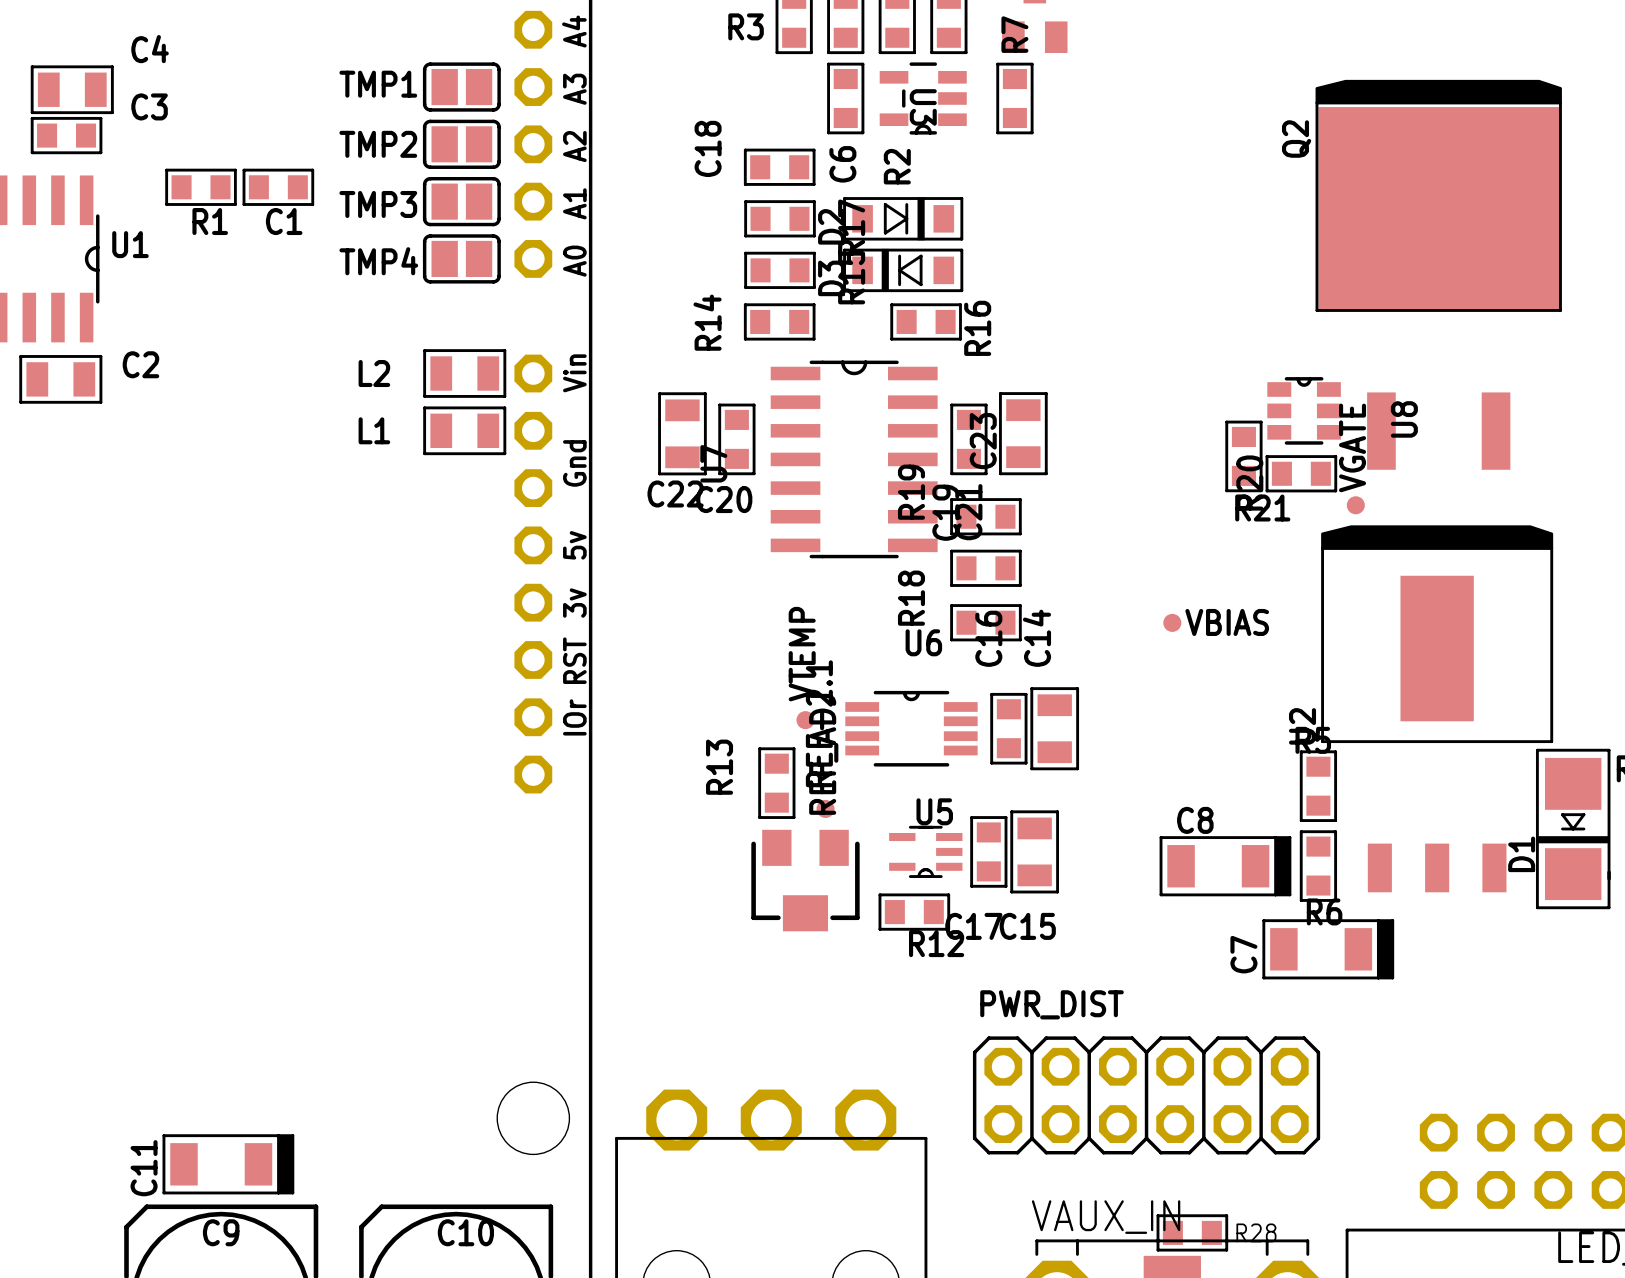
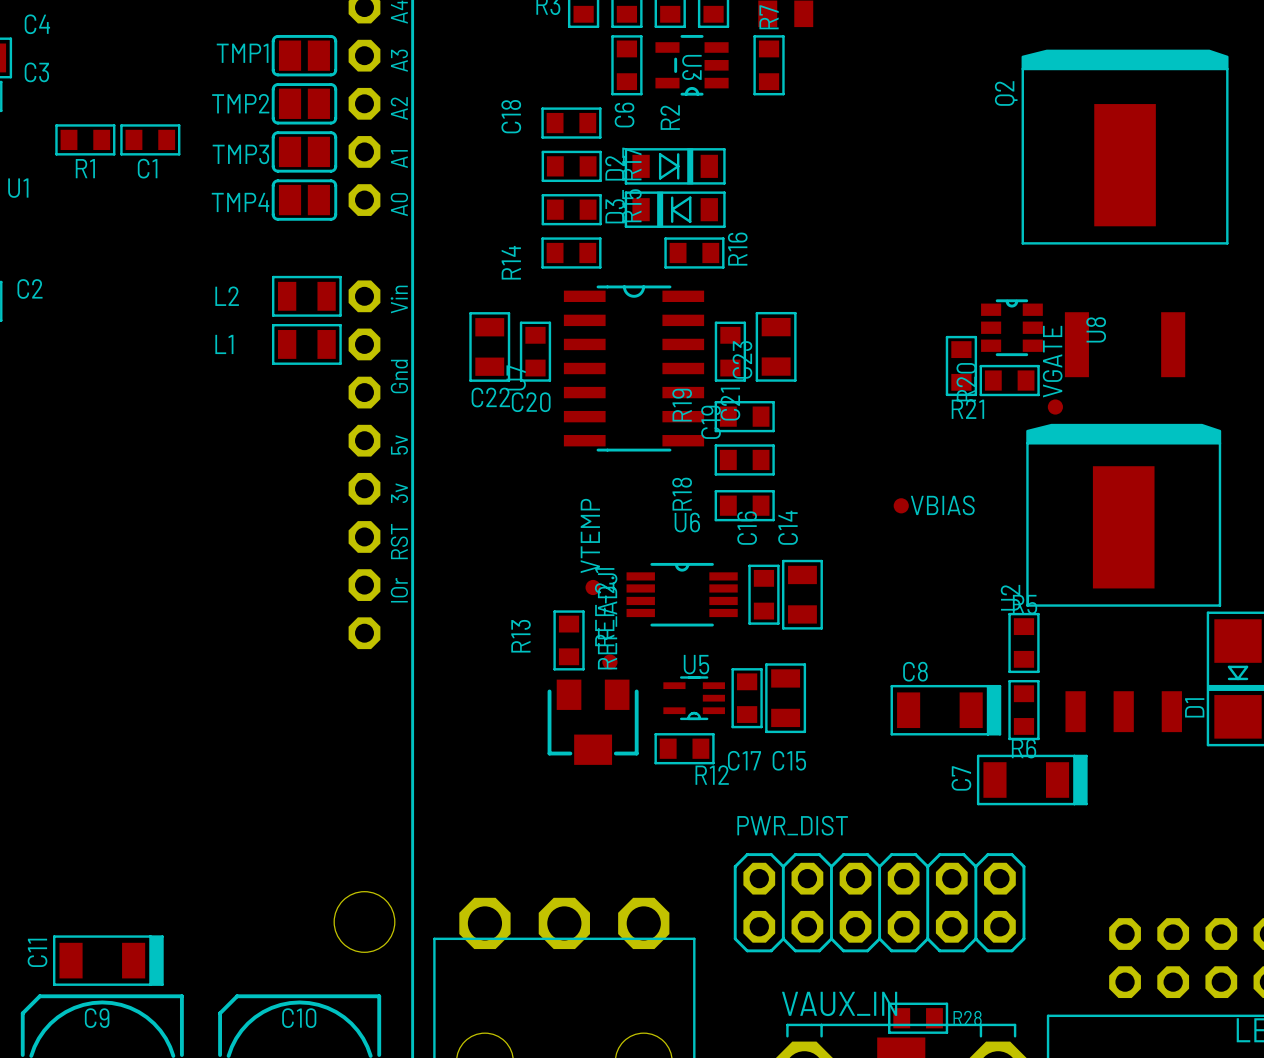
Q2 footprint: [1315, 79, 1562, 470] -> [1021, 49, 1229, 378]

